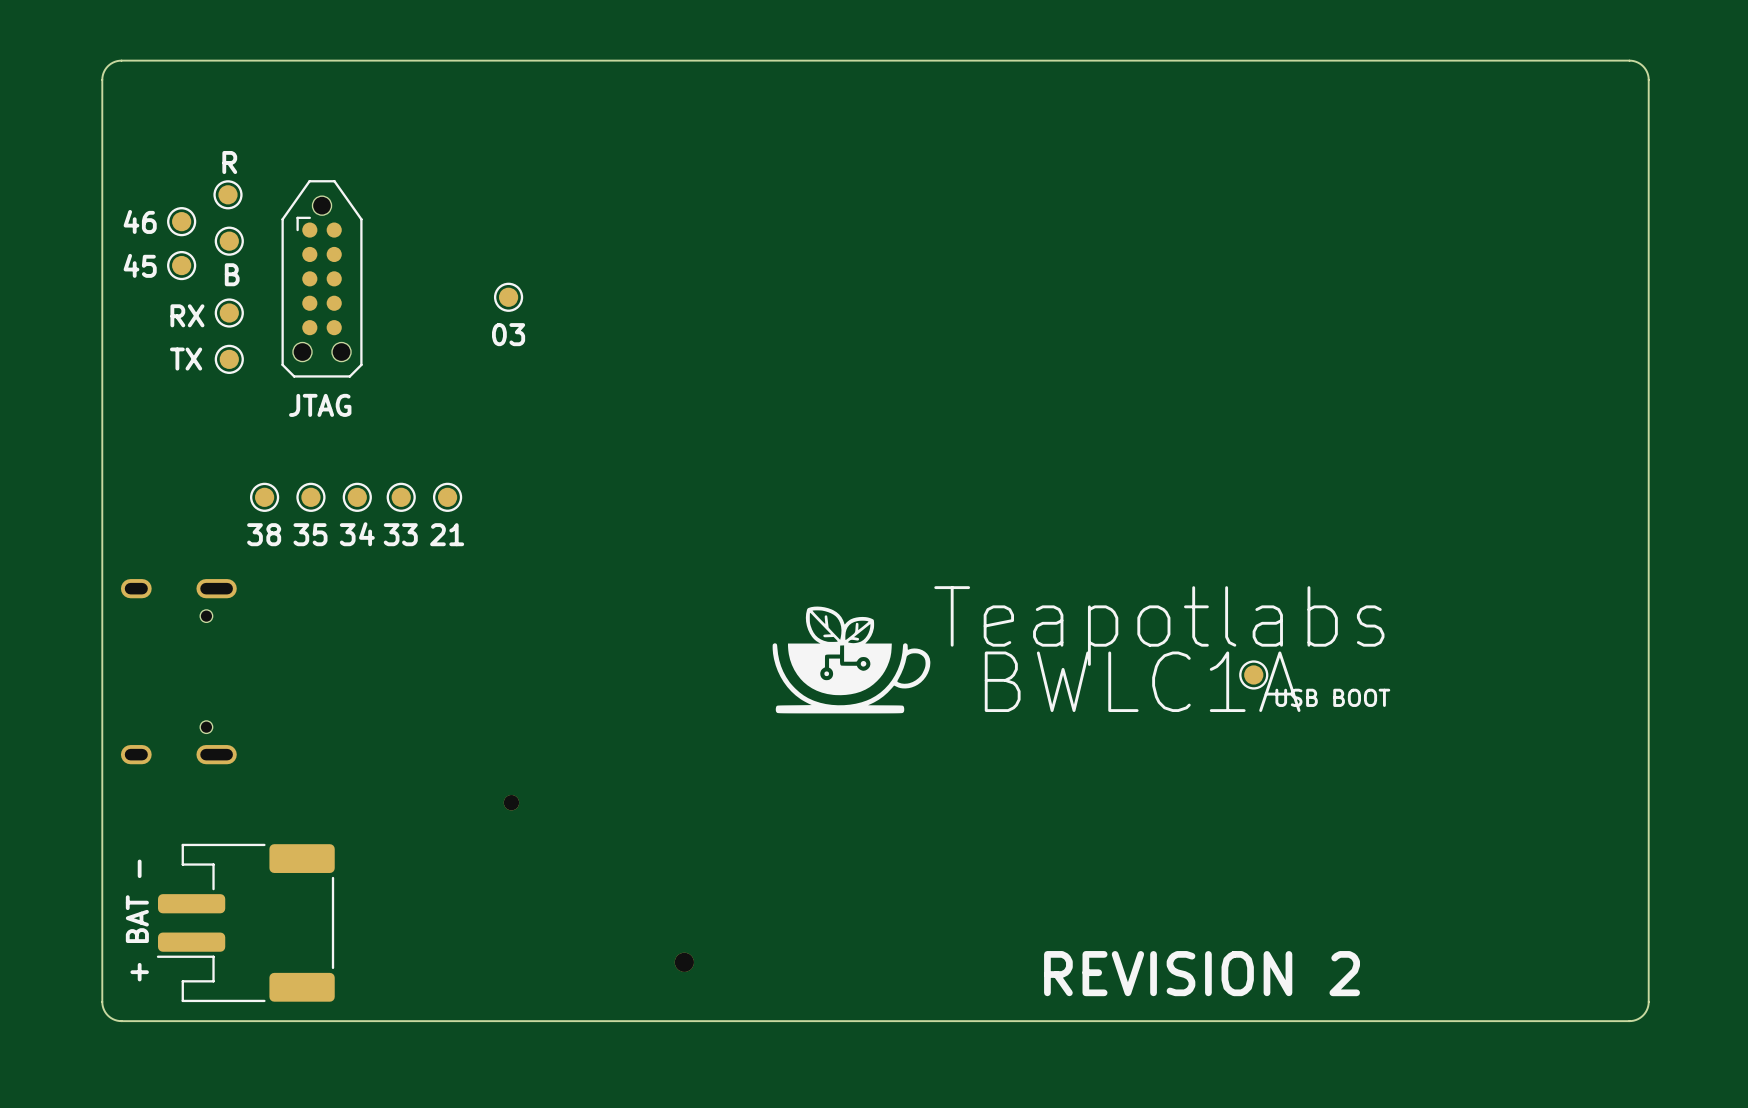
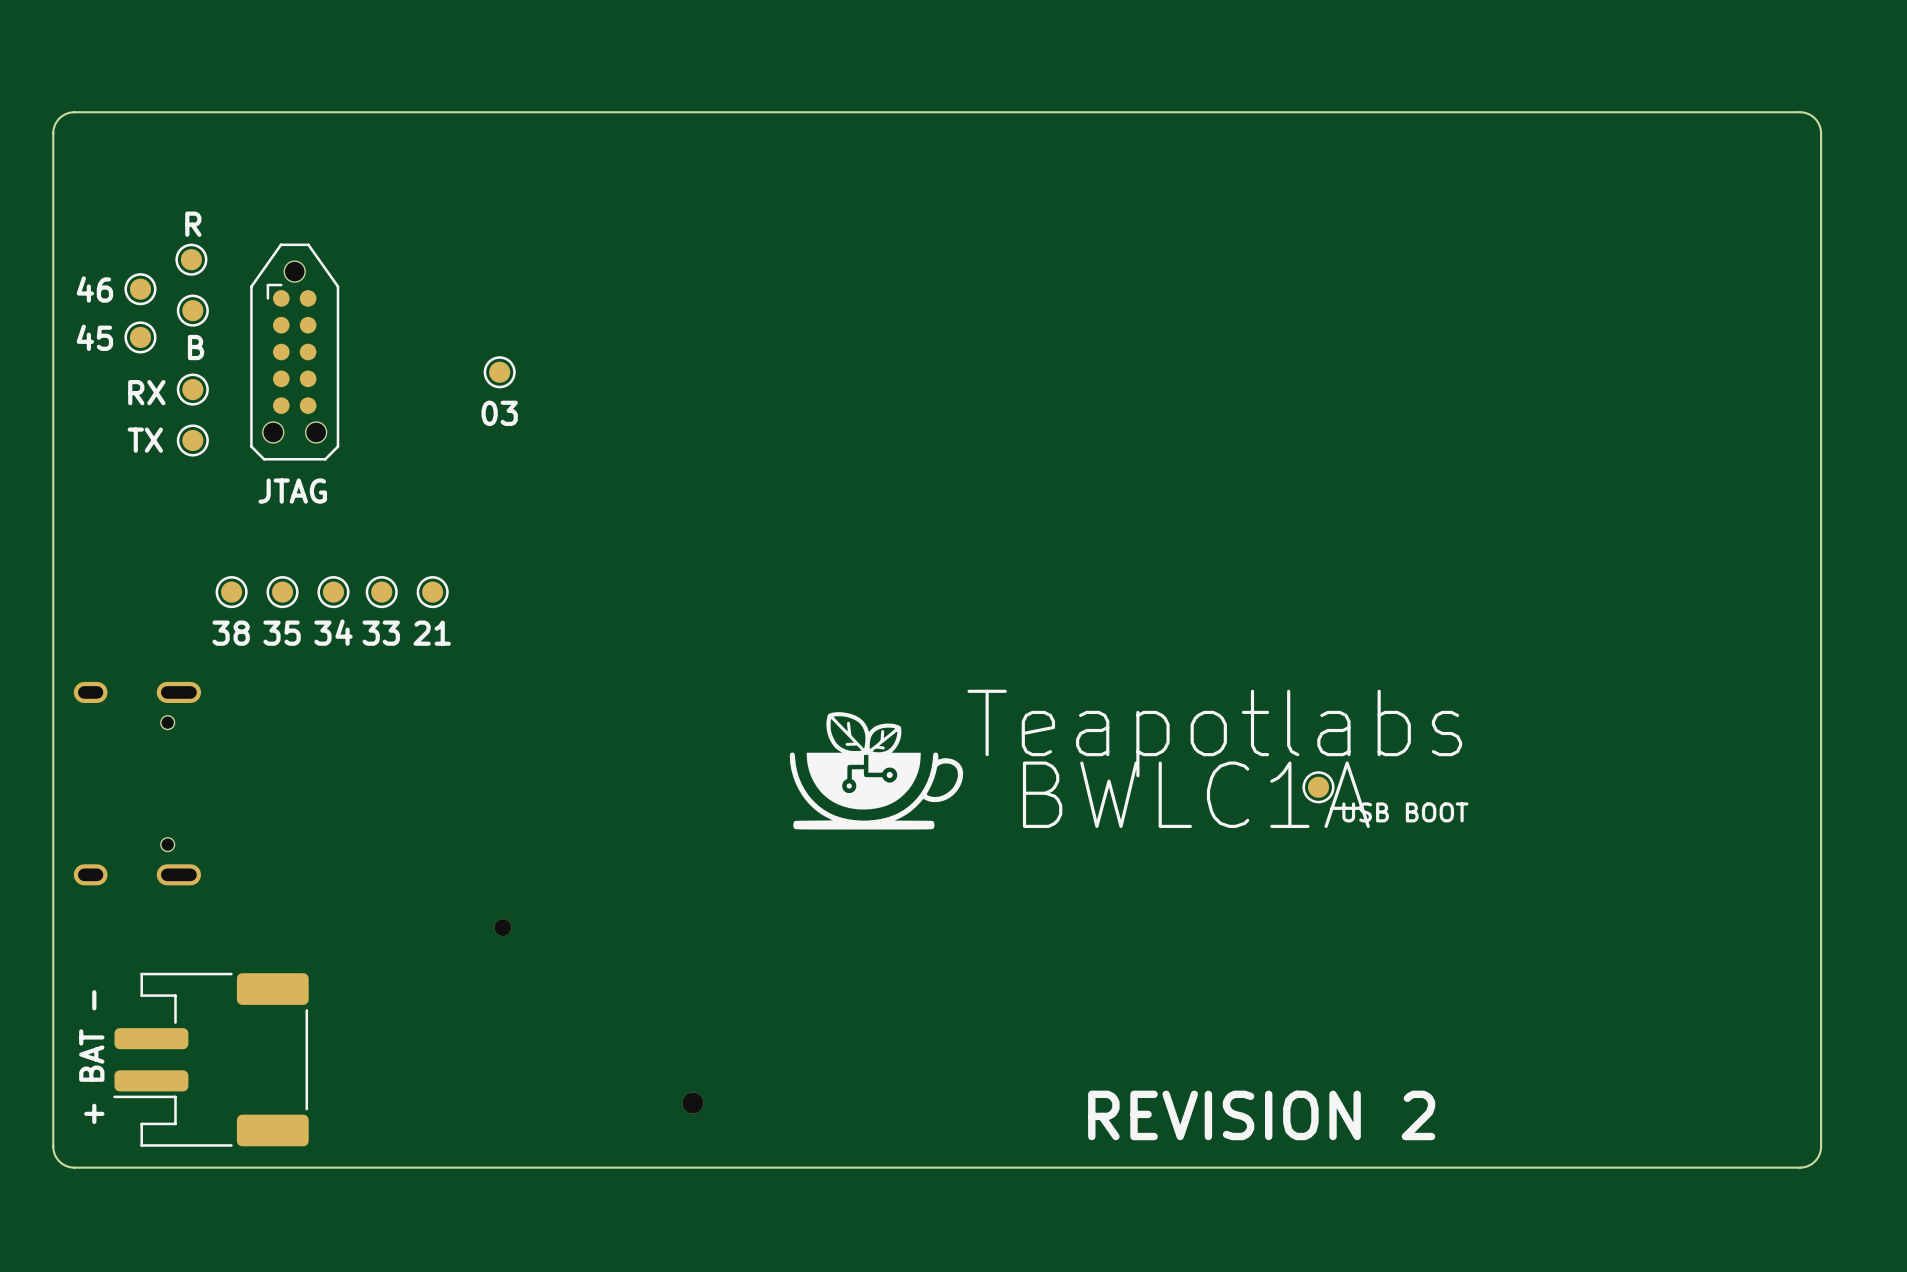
board edge: (1629, 60) (1643, 66) (1648, 79) (1648, 1001) (1643, 1015) (1629, 1021) -> (1731, 112) (1804, 112) (1816, 120) (1821, 133) (1820, 1148) (1816, 1159) (1804, 1167) (1731, 1167)

